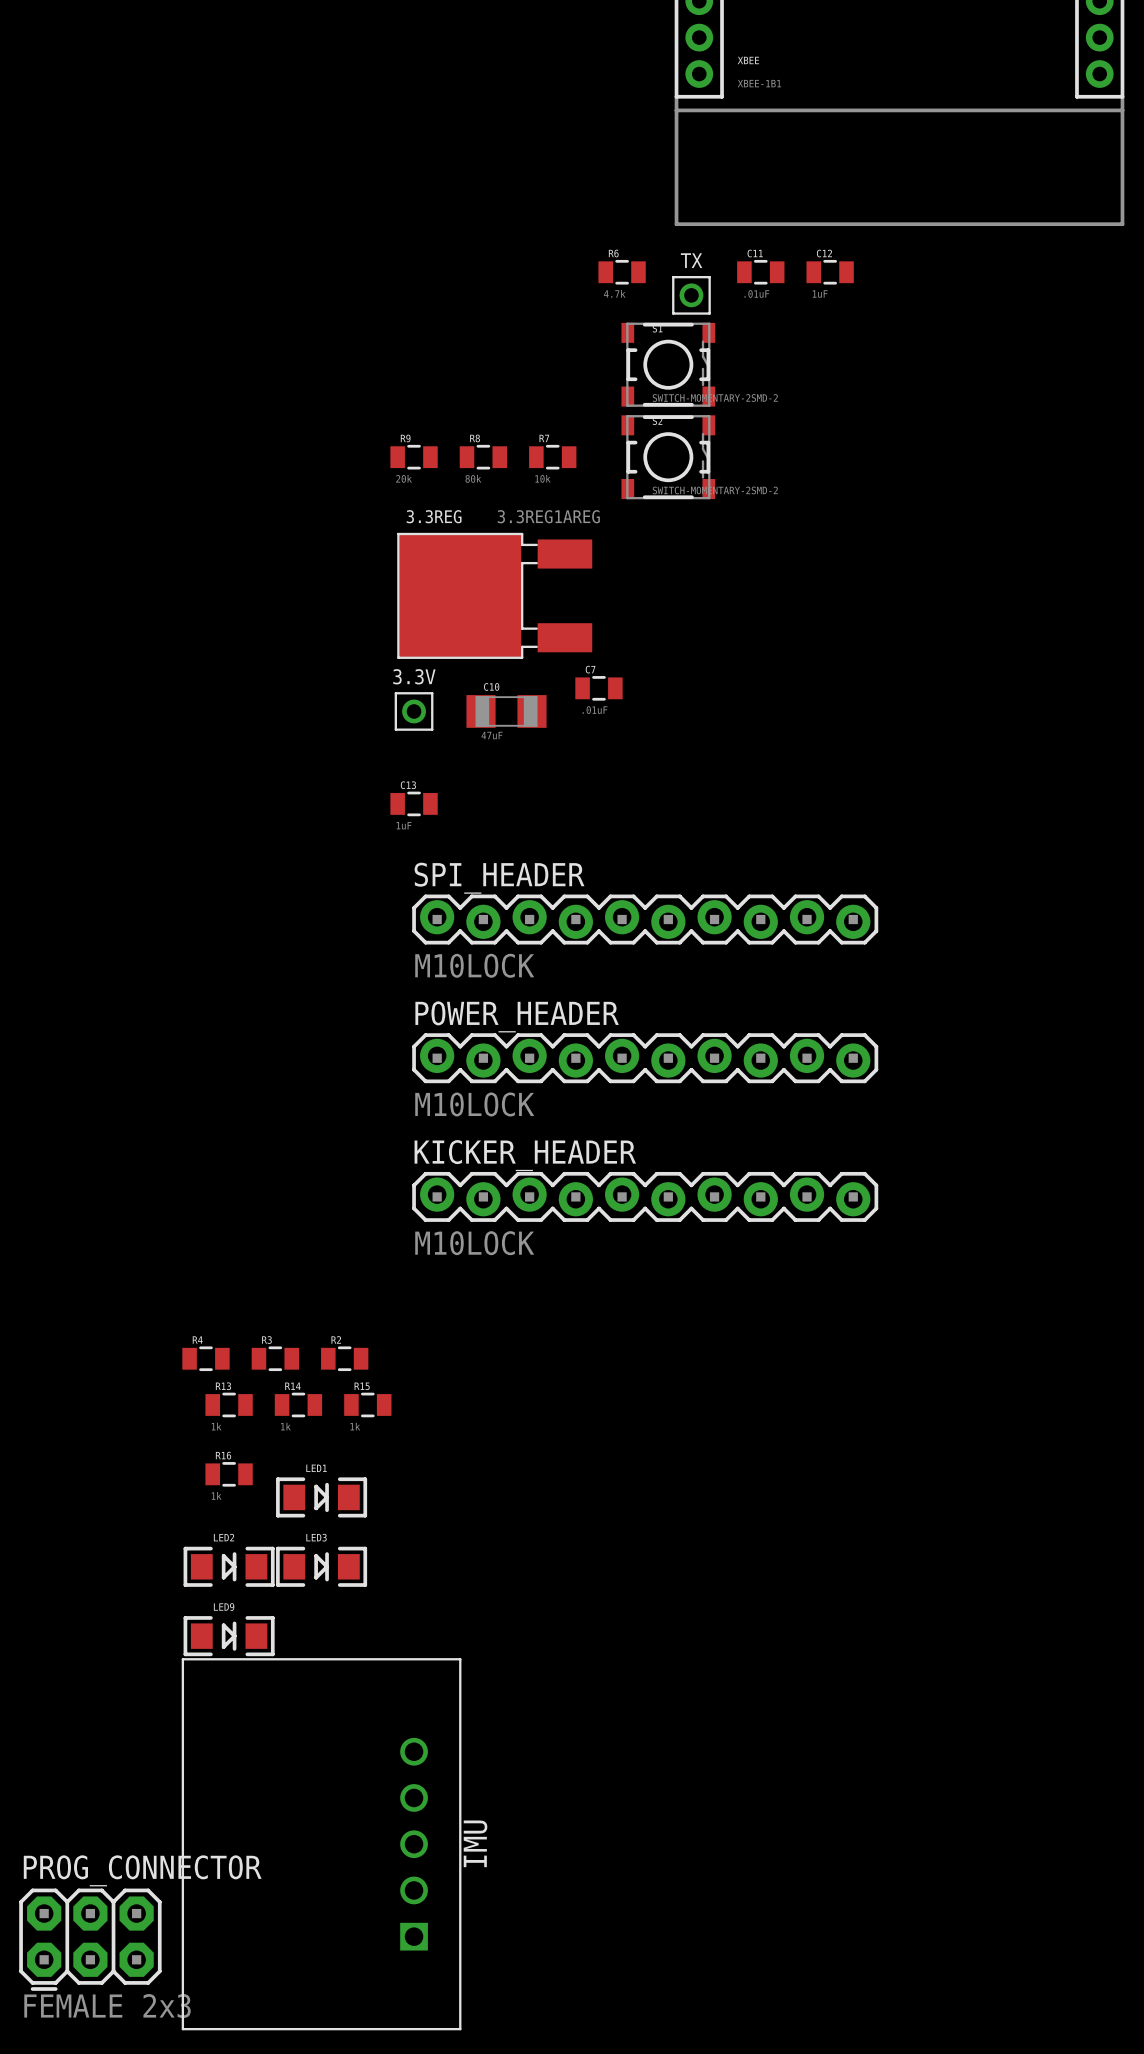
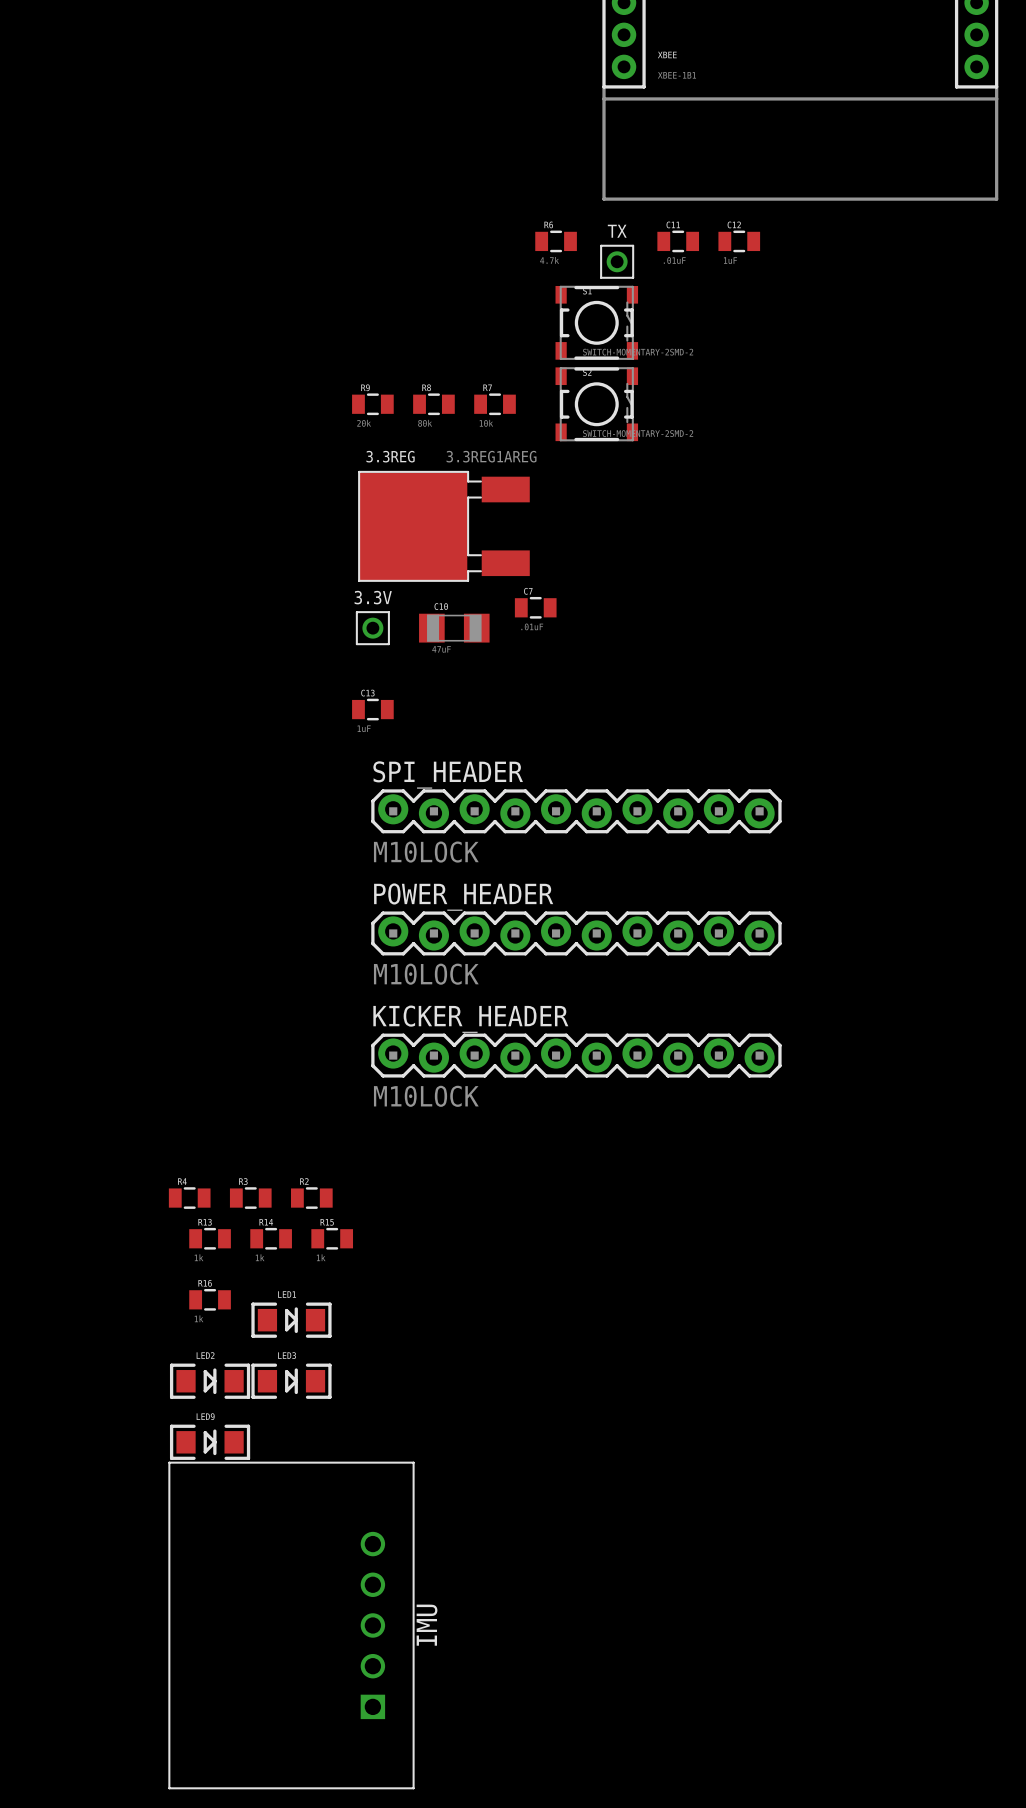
PROG_CONNECTOR: FEMALE 2x3 (90, 1939) -> none

